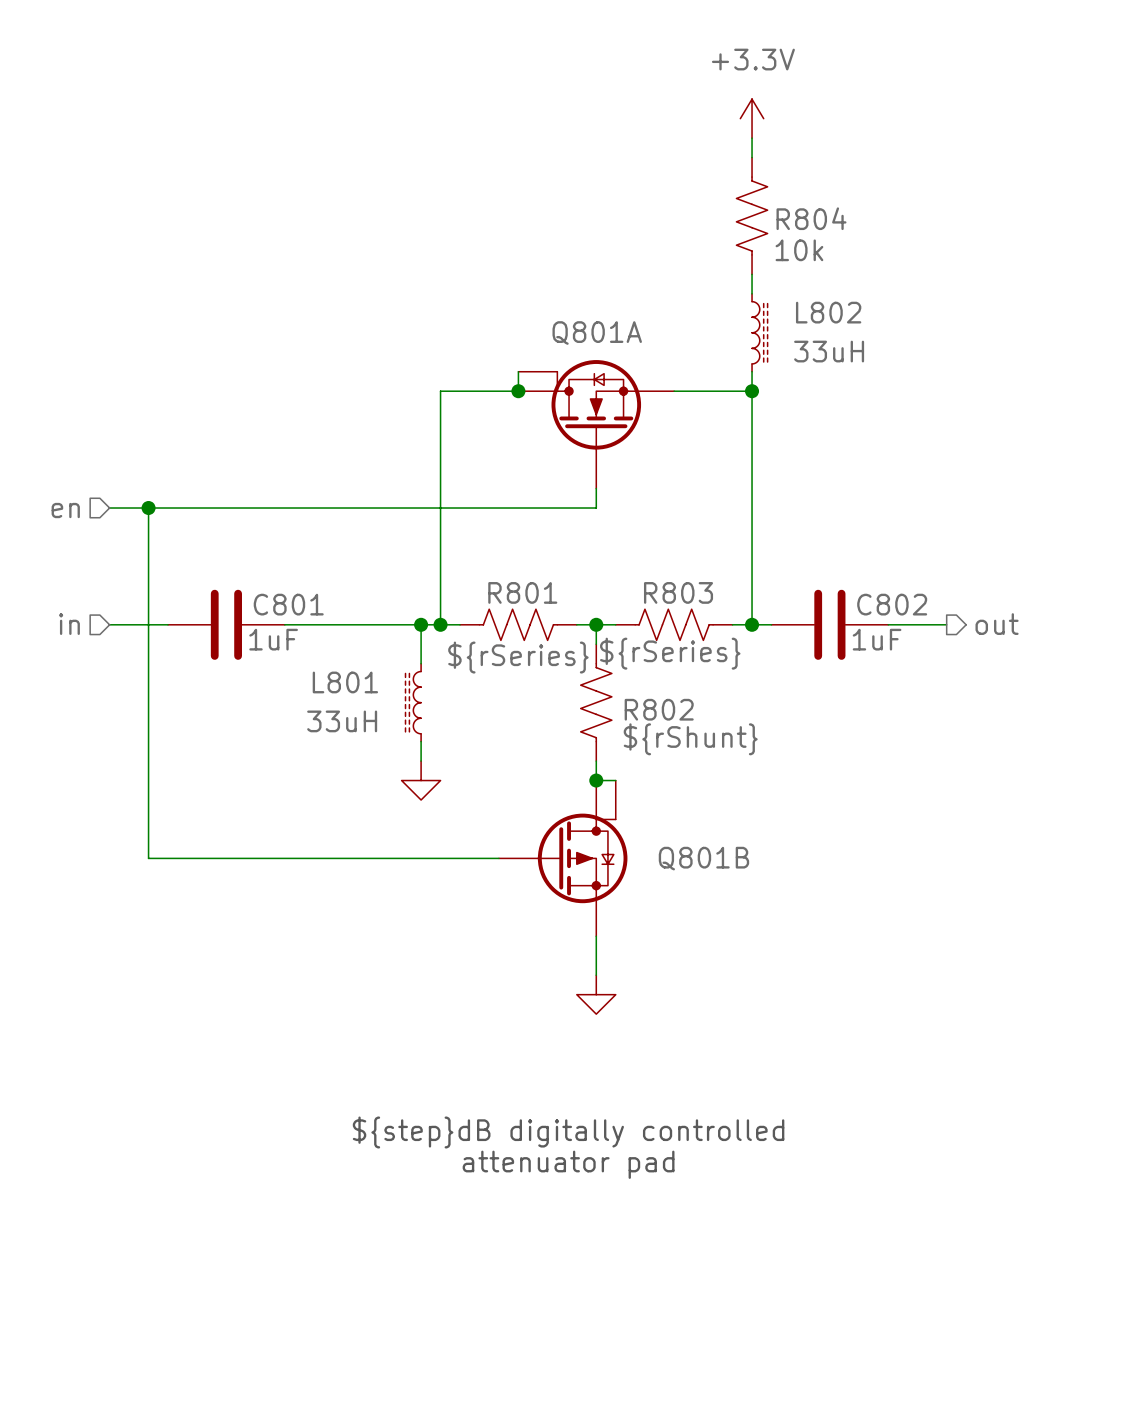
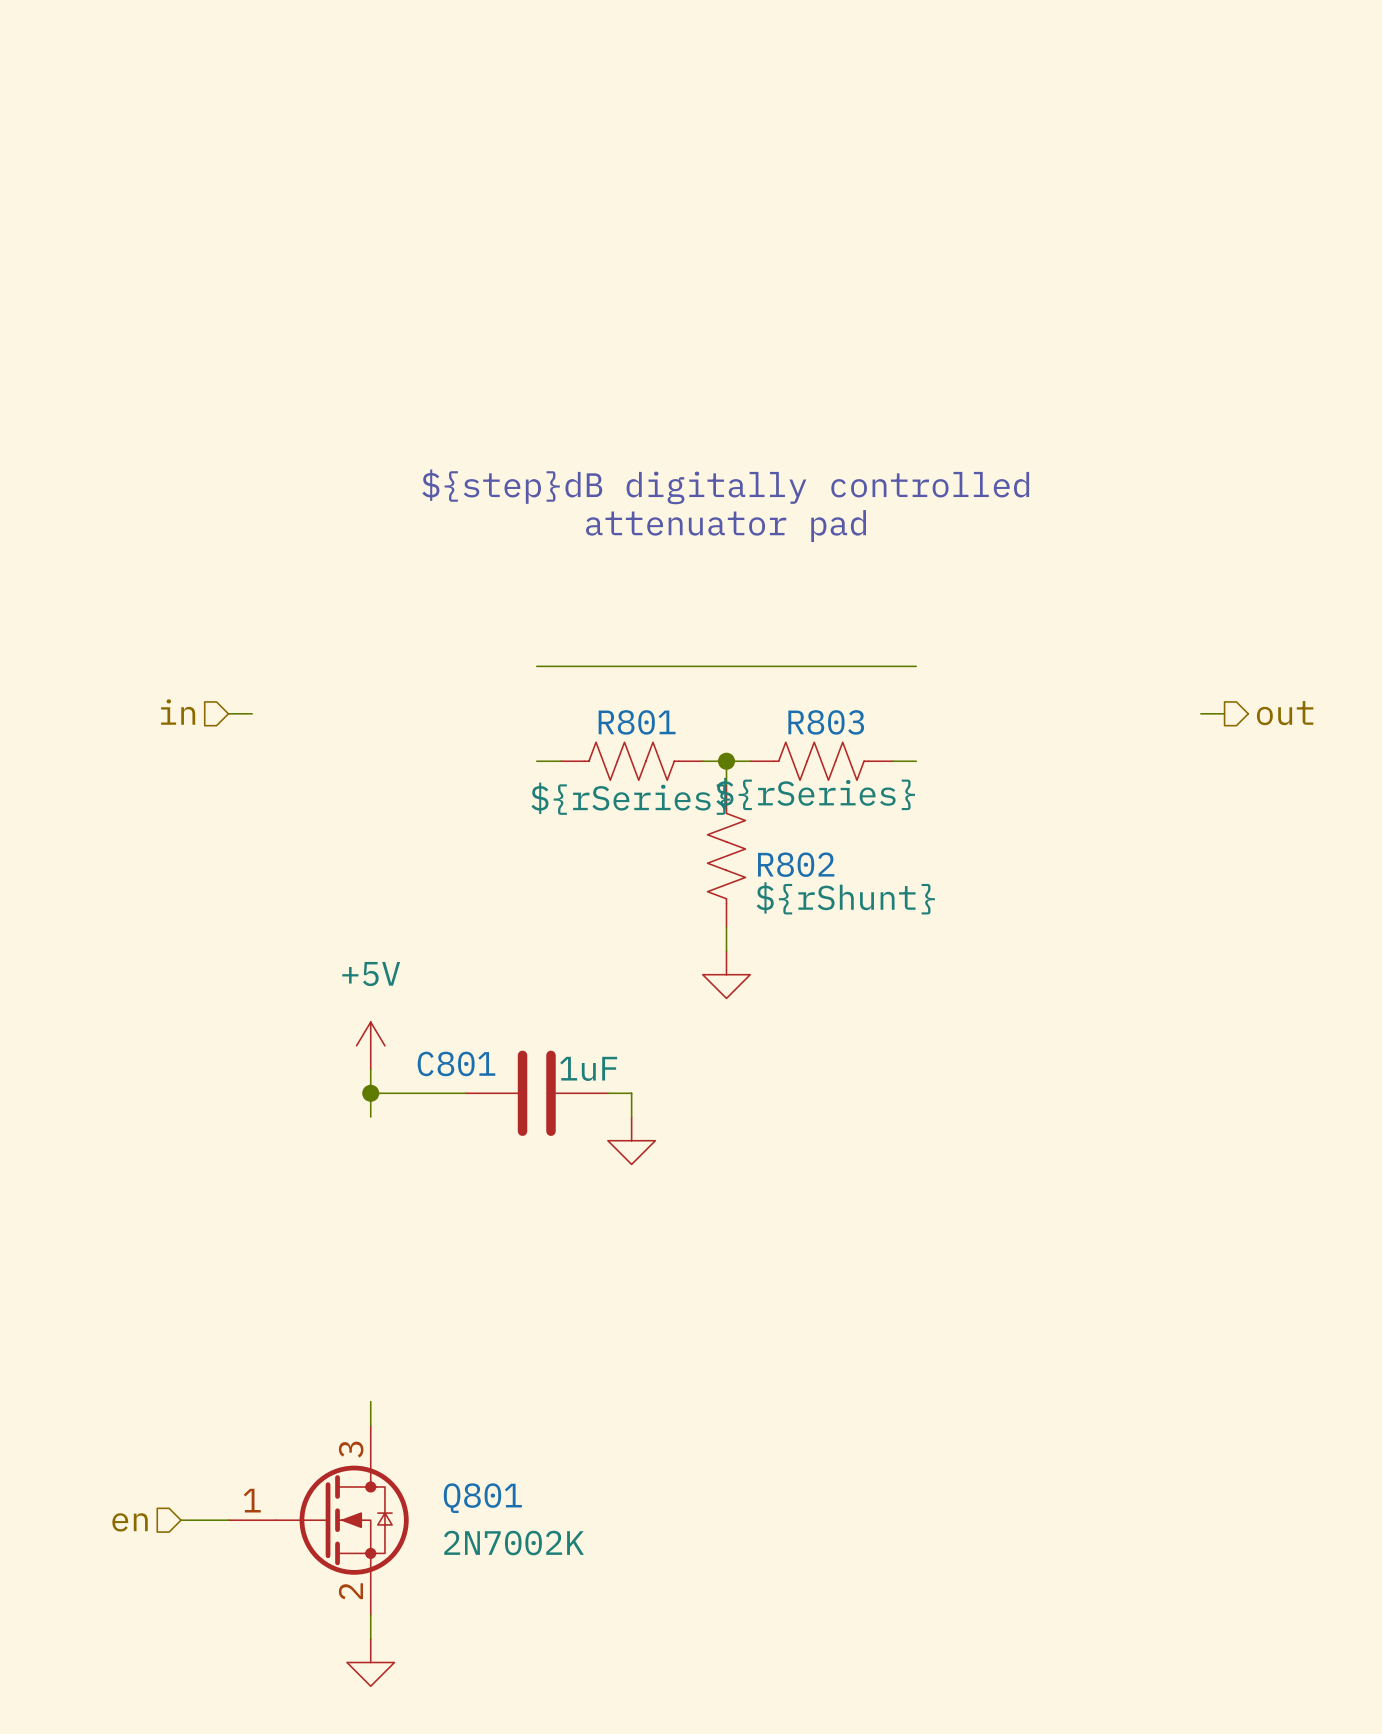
power symbol: +3.3V (752, 118) -> none
wire: (752, 138) (752, 157) -> none
R804: 10k (752, 216) -> none
wire: (752, 274) (752, 293) -> none
L802: 33uH (759, 332) -> none
wire: (518, 371) (518, 391) (440, 391) (440, 624) (284, 624) -> none
wire: (752, 371) (752, 624) (771, 624) -> none
junction: (518, 391) -> none
wire: (674, 391) (752, 391) -> none
junction: (752, 391) -> none
text: none -> ${step}dB digitally controlled (725, 486)
Q801A: (596, 424) -> none
text: none -> attenuator pad (726, 526)
wire: (596, 488) (596, 508) (109, 508) -> none
wire: (148, 508) (148, 858) (498, 858) -> none
junction: (148, 508) -> none
hierarchical label: en (65, 510) -> none
wire: none -> (536, 666) (916, 666)
wire: none -> (228, 713) (252, 713)
wire: none -> (1200, 713) (1224, 713)
C801 name position: C801 (288, 604) -> C801 (456, 1063)
hierarchical label position: in (69, 624) -> in (178, 712)
wire: (109, 624) (168, 624) -> none
C801 position: (226, 624) -> (536, 1093)
wire: (421, 624) (421, 663) -> (370, 1069) (370, 1117)
junction: (421, 624) -> none
junction: (440, 624) -> none
junction: (752, 624) -> none
C802: 1uF (829, 624) -> none
wire: (888, 624) (946, 624) -> none
hierarchical label position: out (997, 624) -> out (1285, 713)
C801 value position: 1uF (273, 639) -> 1uF (588, 1068)
L801: 33uH (413, 702) -> none
wire: (421, 741) (421, 761) -> none
power symbol: (421, 780) -> none
wire: (596, 780) (615, 780) -> none
junction: (596, 780) -> none
power symbol: none -> (726, 974)
power symbol: none -> +5V (370, 1045)
Q801B: (563, 858) -> none
wire: none -> (370, 1093) (465, 1093)
junction: none -> (370, 1093)
wire: none -> (607, 1093) (631, 1093) (631, 1117)
power symbol: none -> (631, 1140)
wire: (596, 936) (596, 975) -> none
power symbol: (596, 994) -> none
text: ${step}dB digitally controlled (568, 1132) -> none
wire: none -> (370, 1401) (370, 1425)
text: attenuator pad (568, 1164) -> none
wire: none -> (180, 1520) (228, 1520)
Q801: none -> 2N7002K (318, 1520)
hierarchical label: none -> en (130, 1522)
wire: none -> (370, 1615) (370, 1638)
power symbol: none -> (370, 1662)

